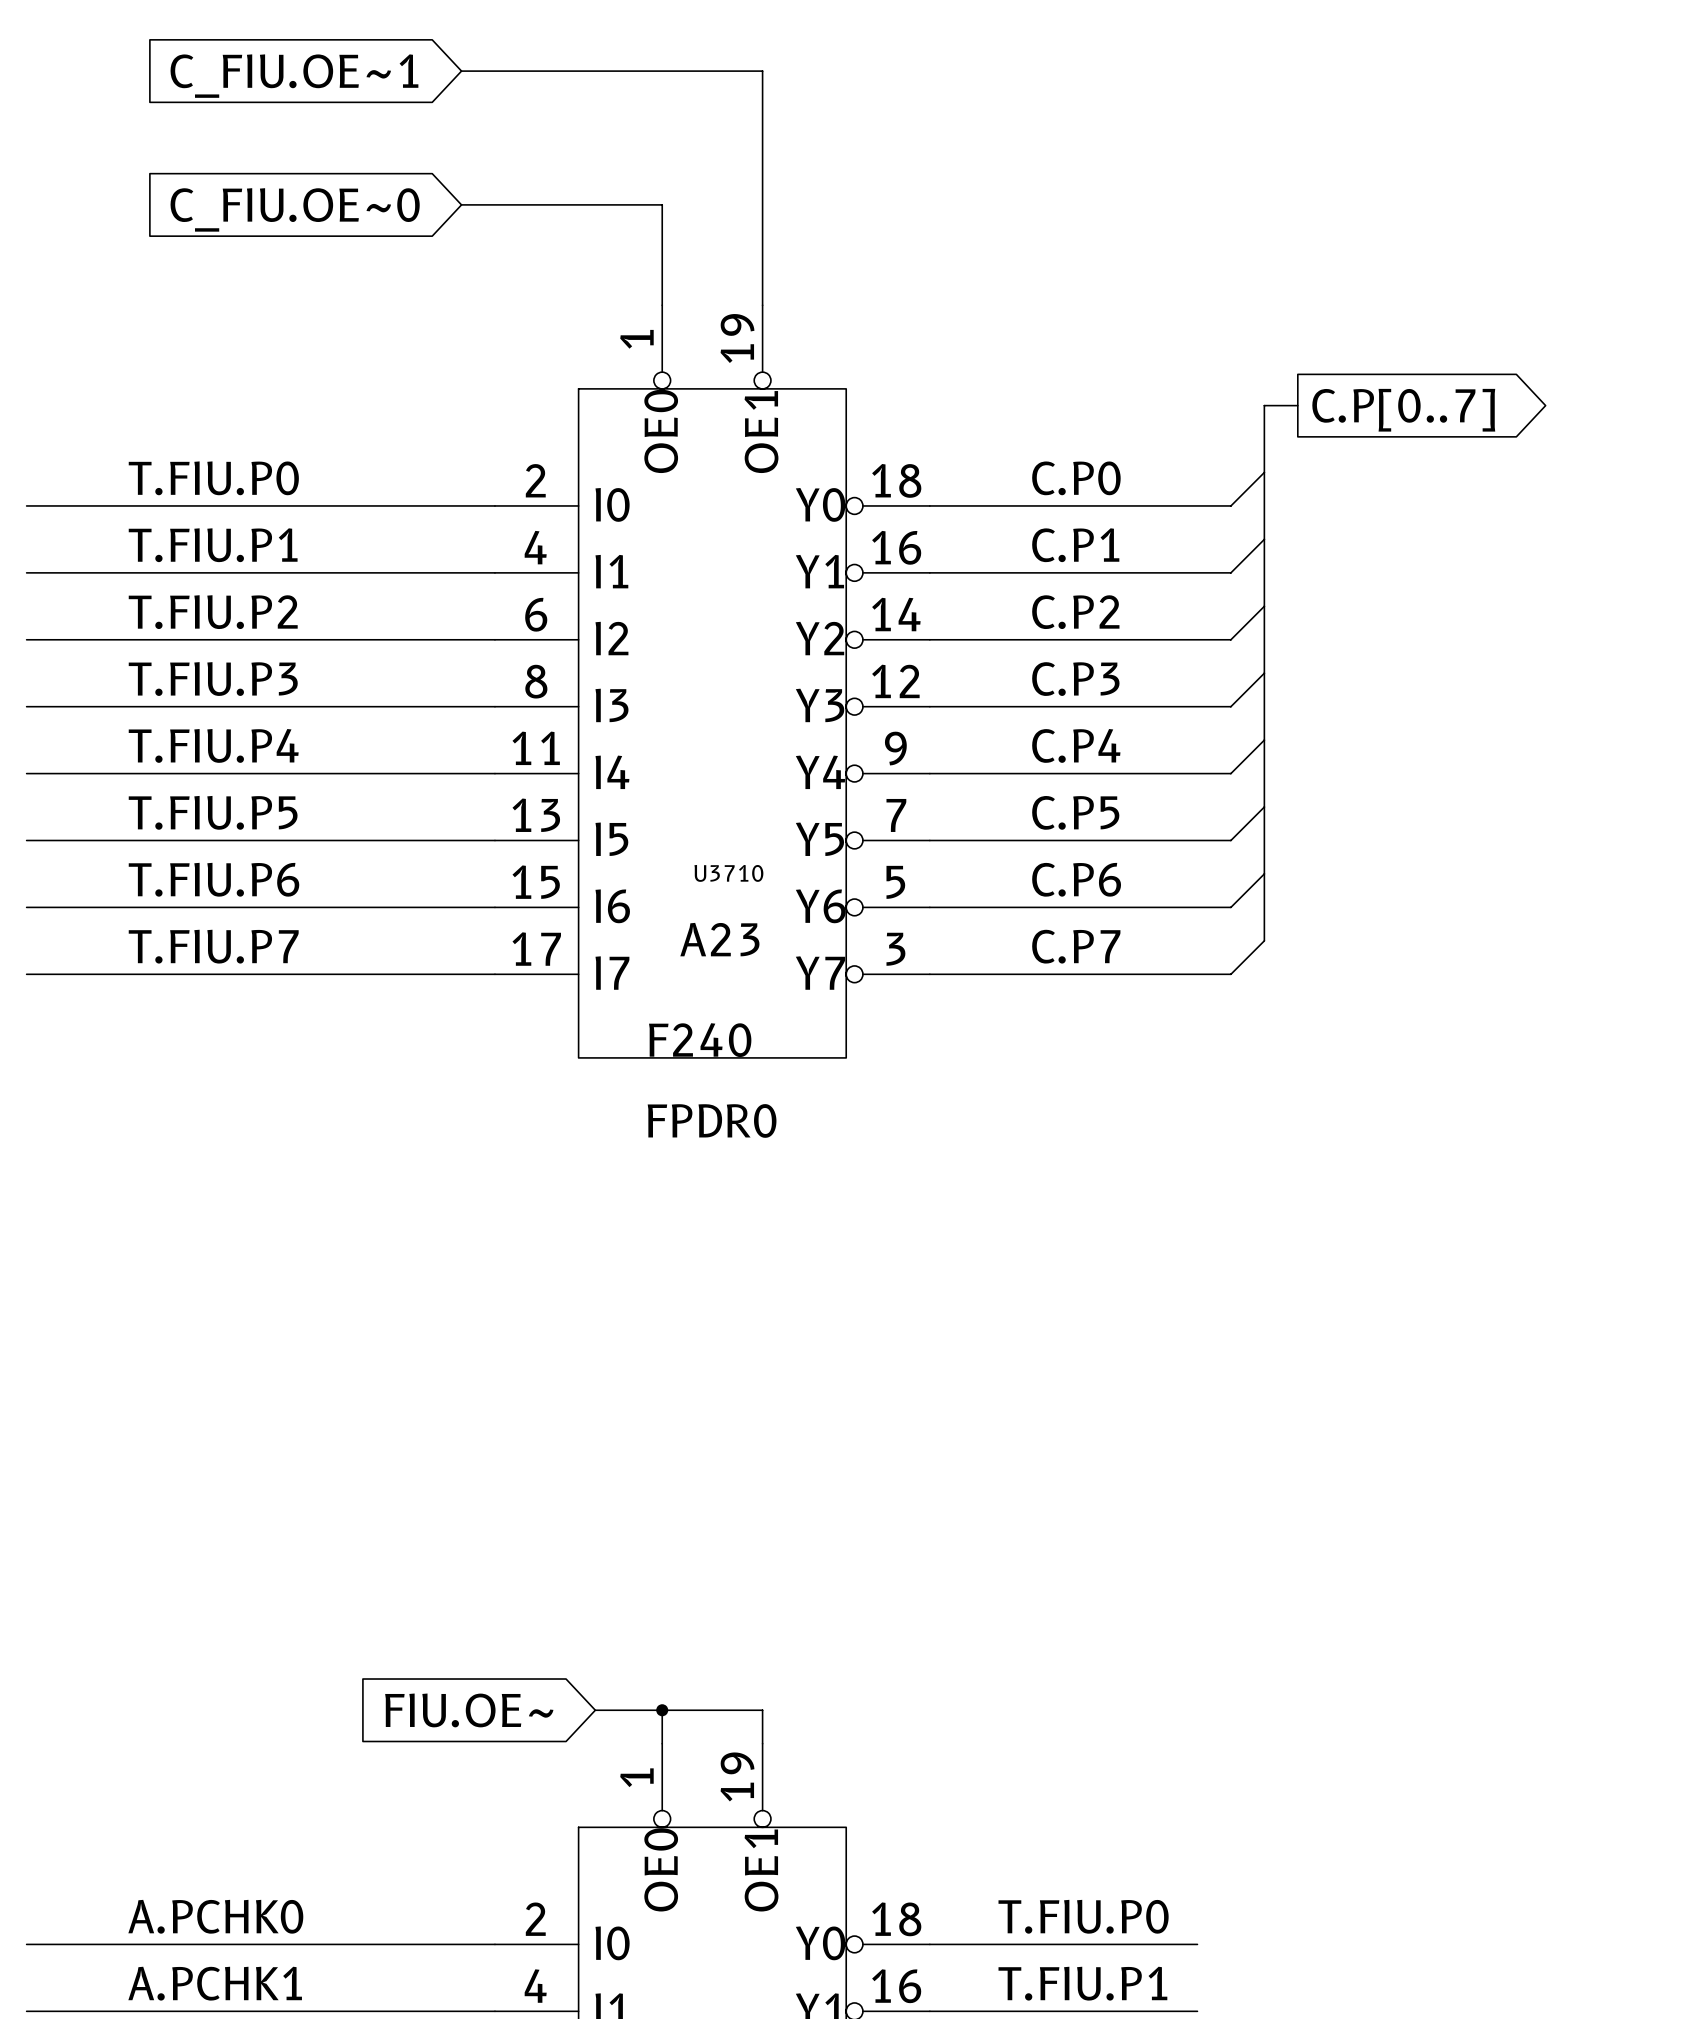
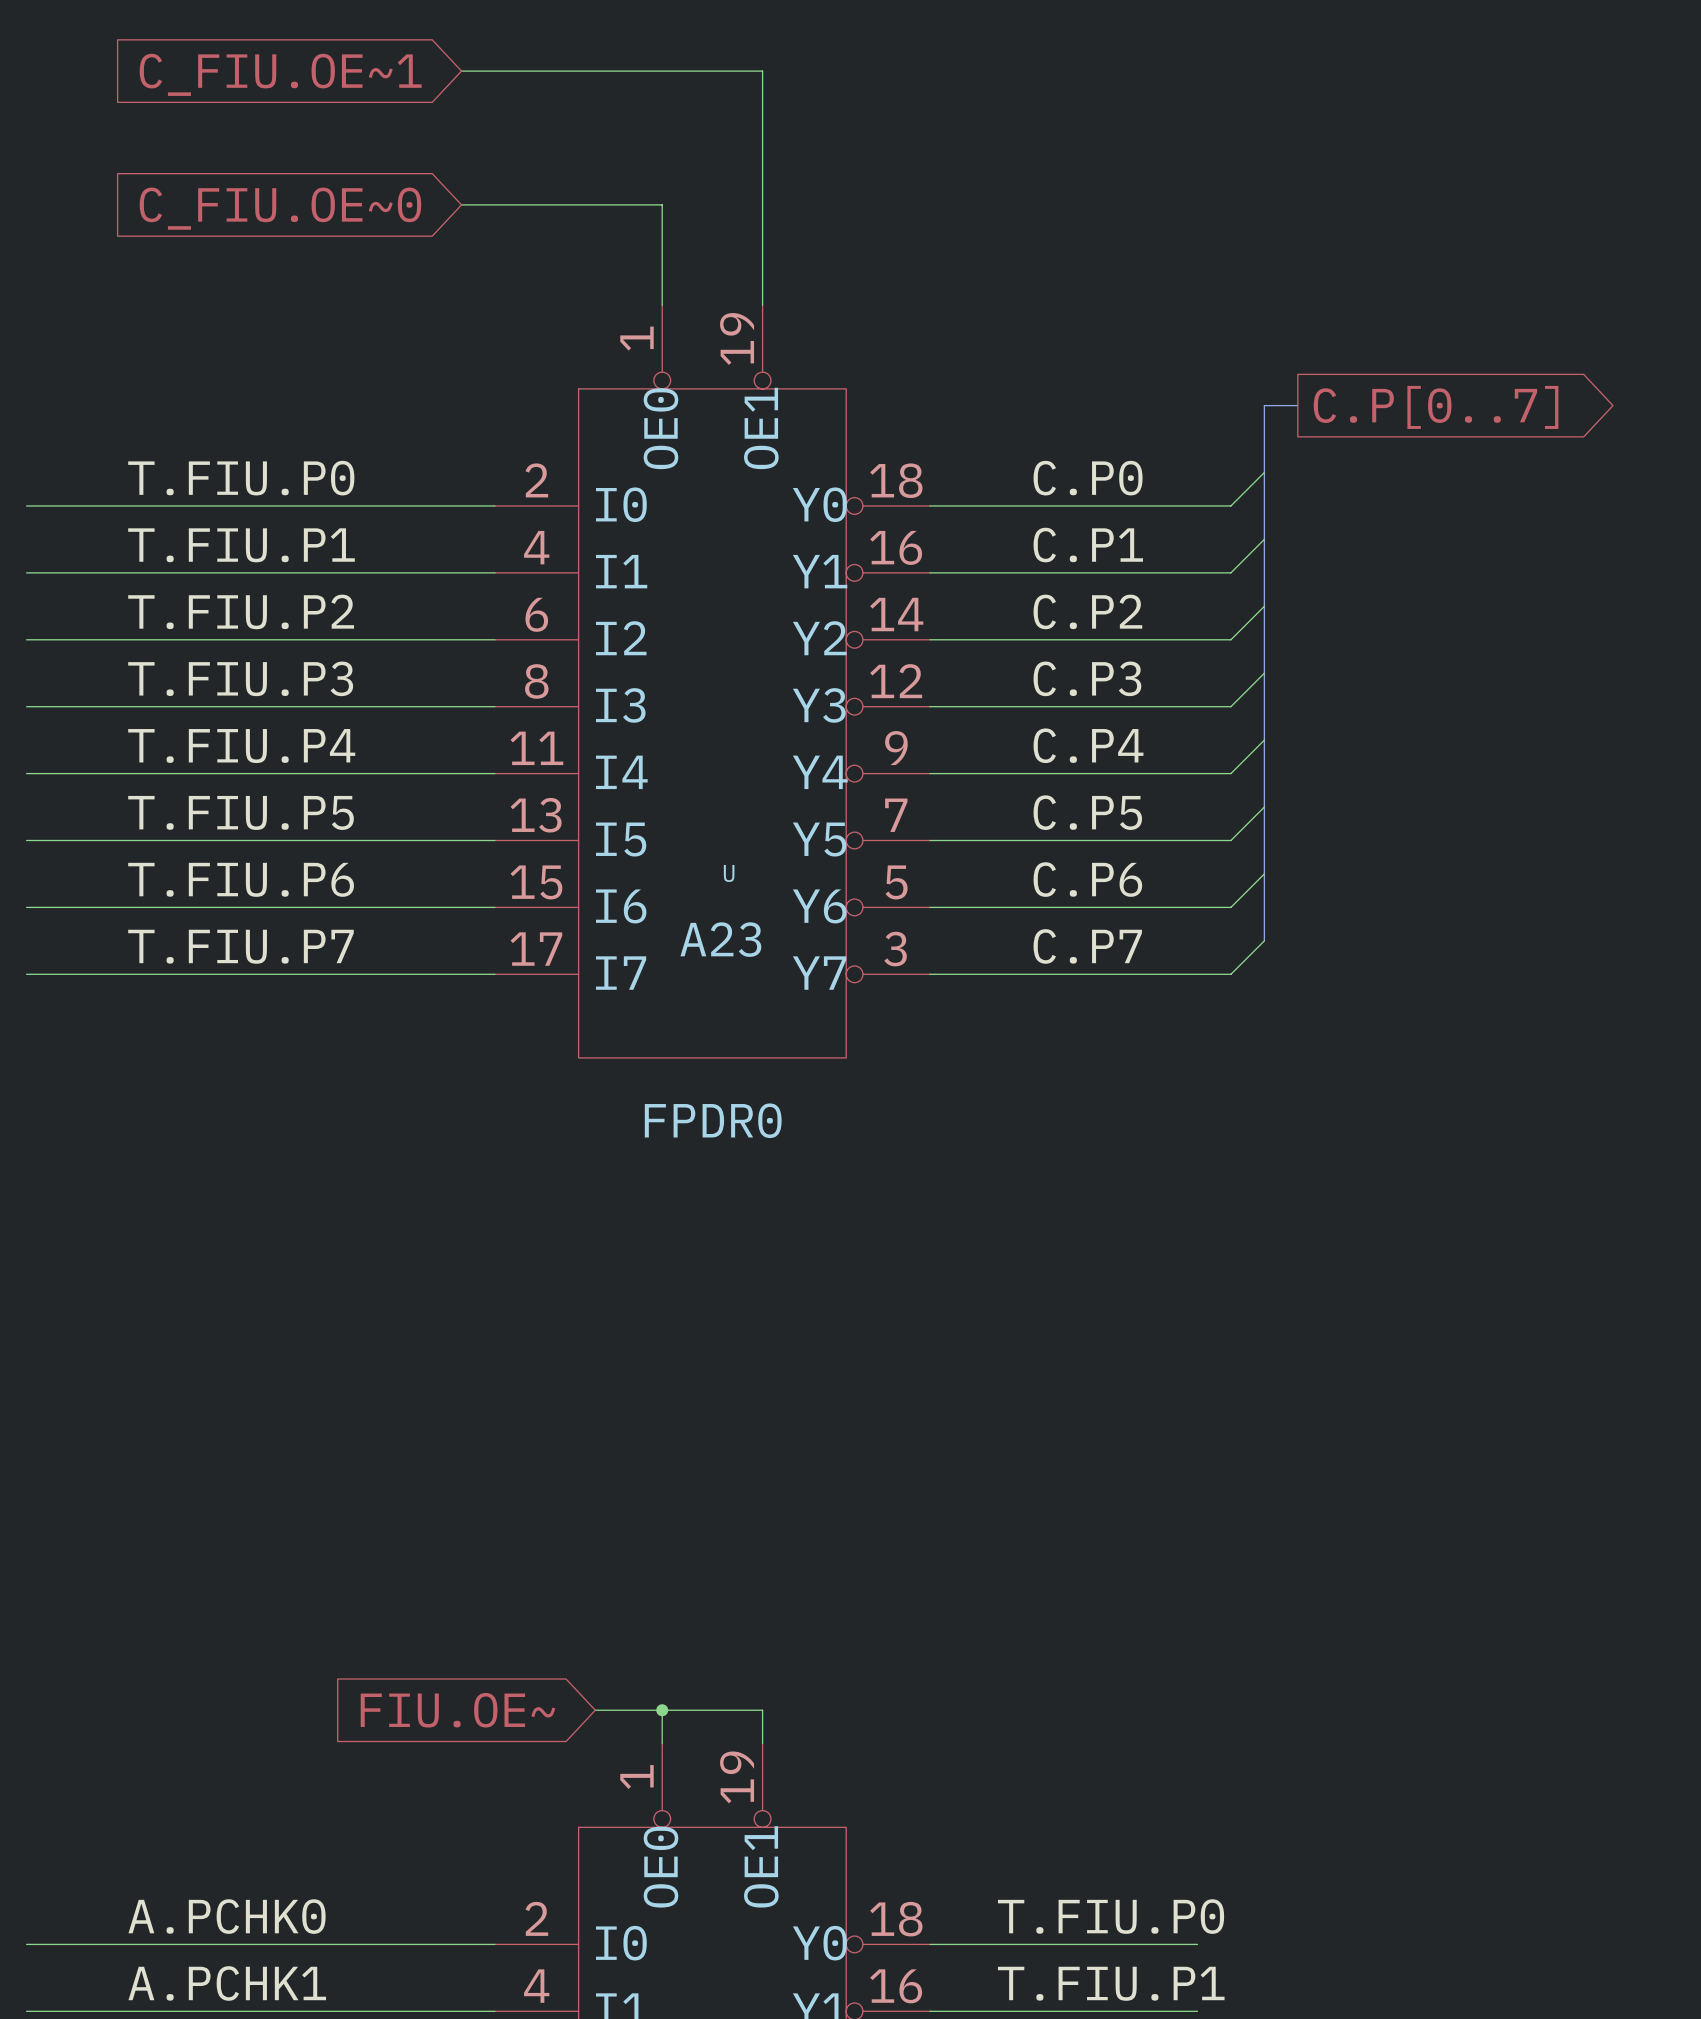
U3710 name: U3710 (728, 873) -> U (729, 873)
U3710 value: F240 (700, 1040) -> none

